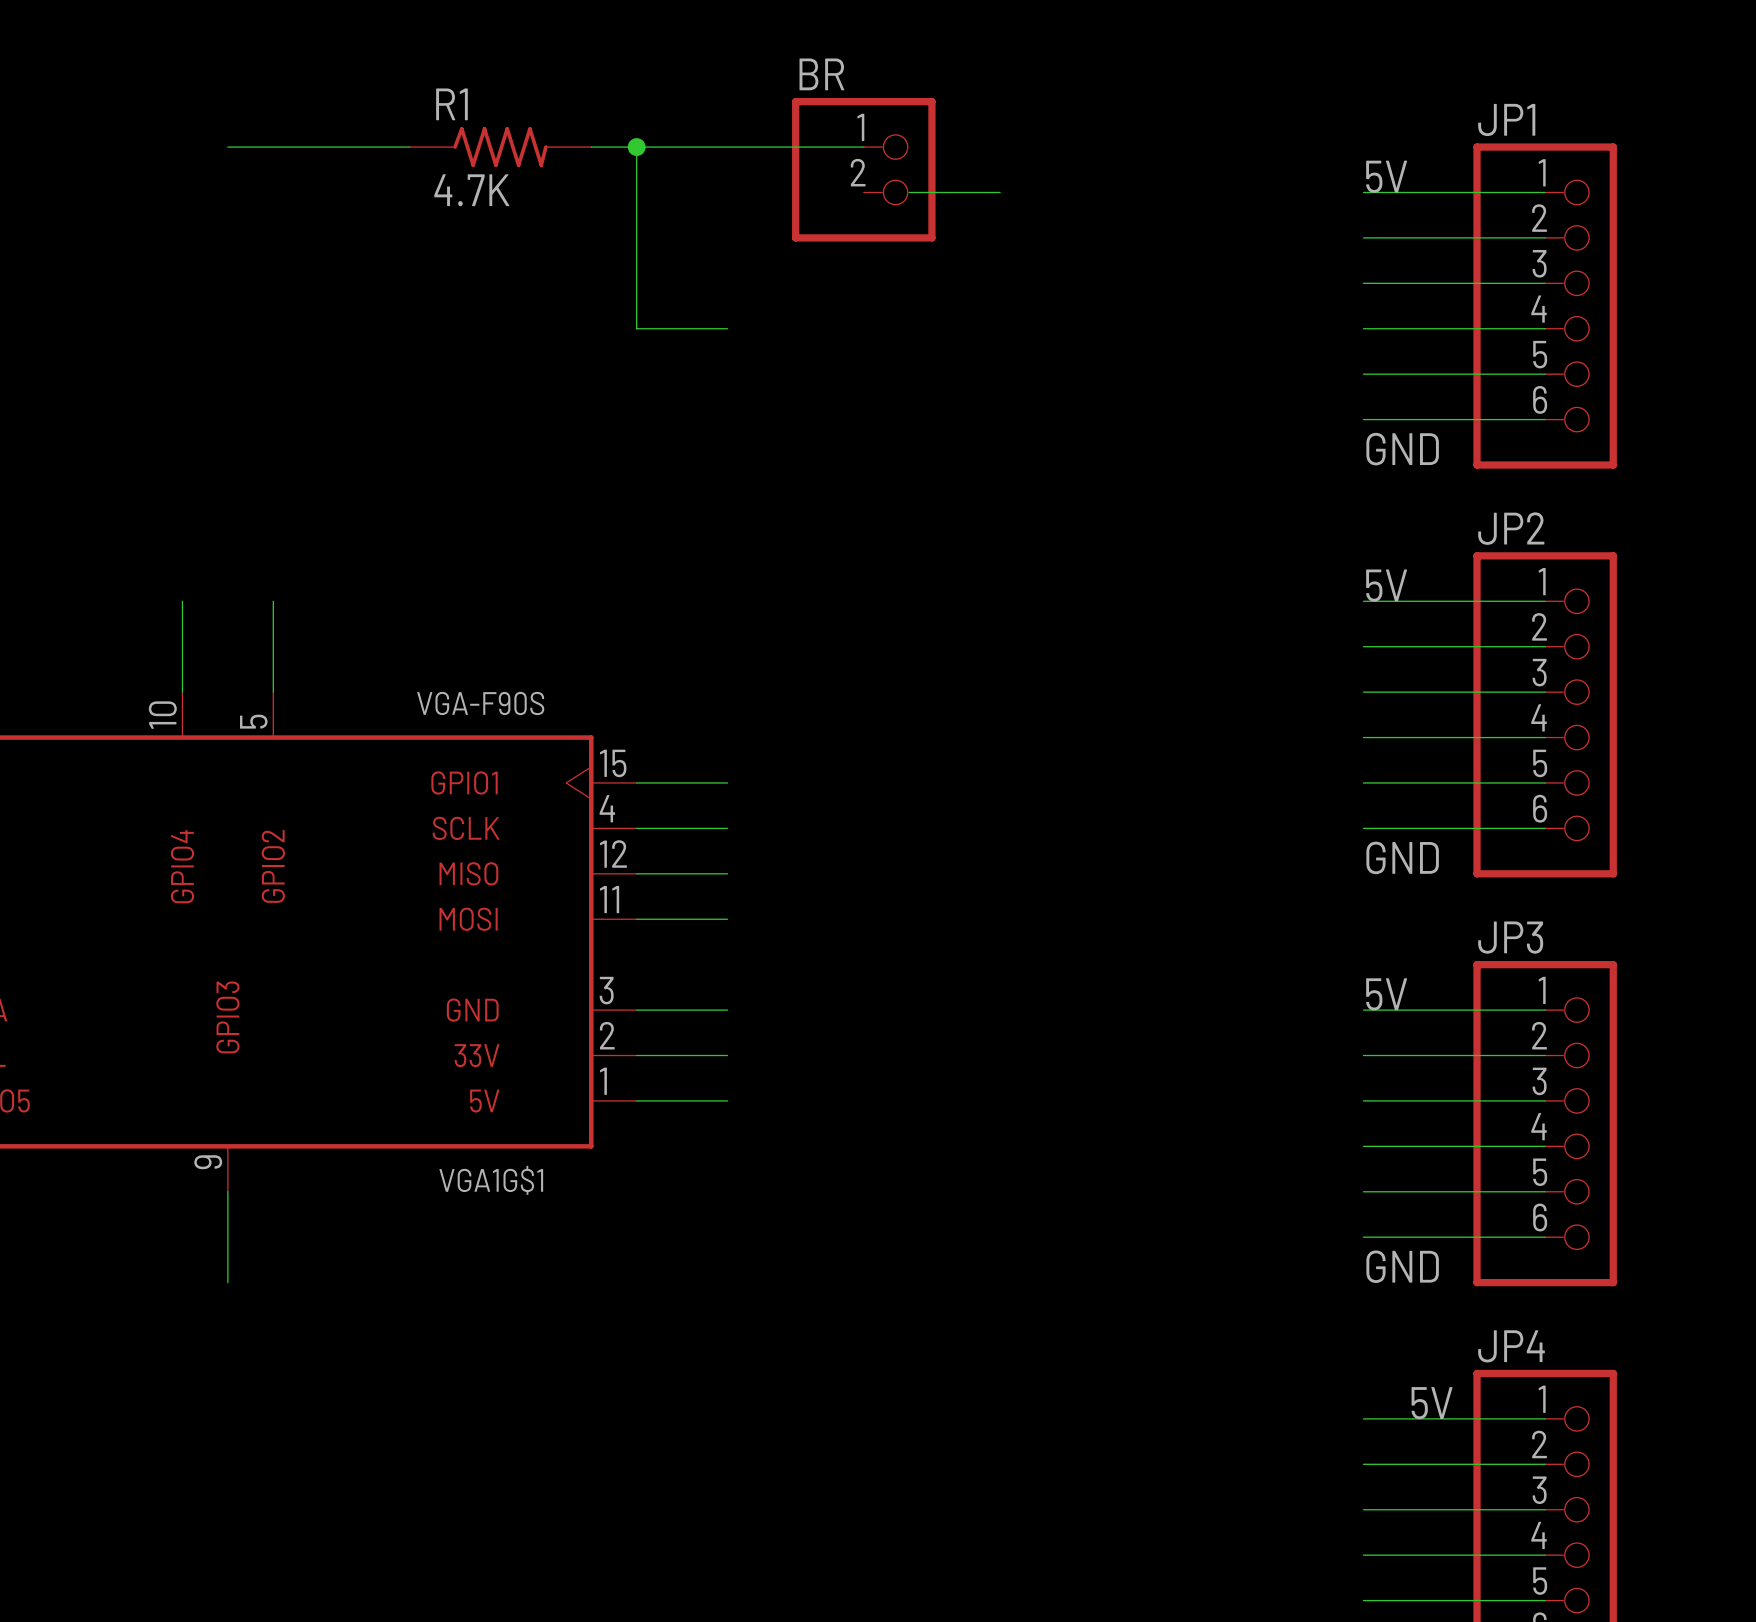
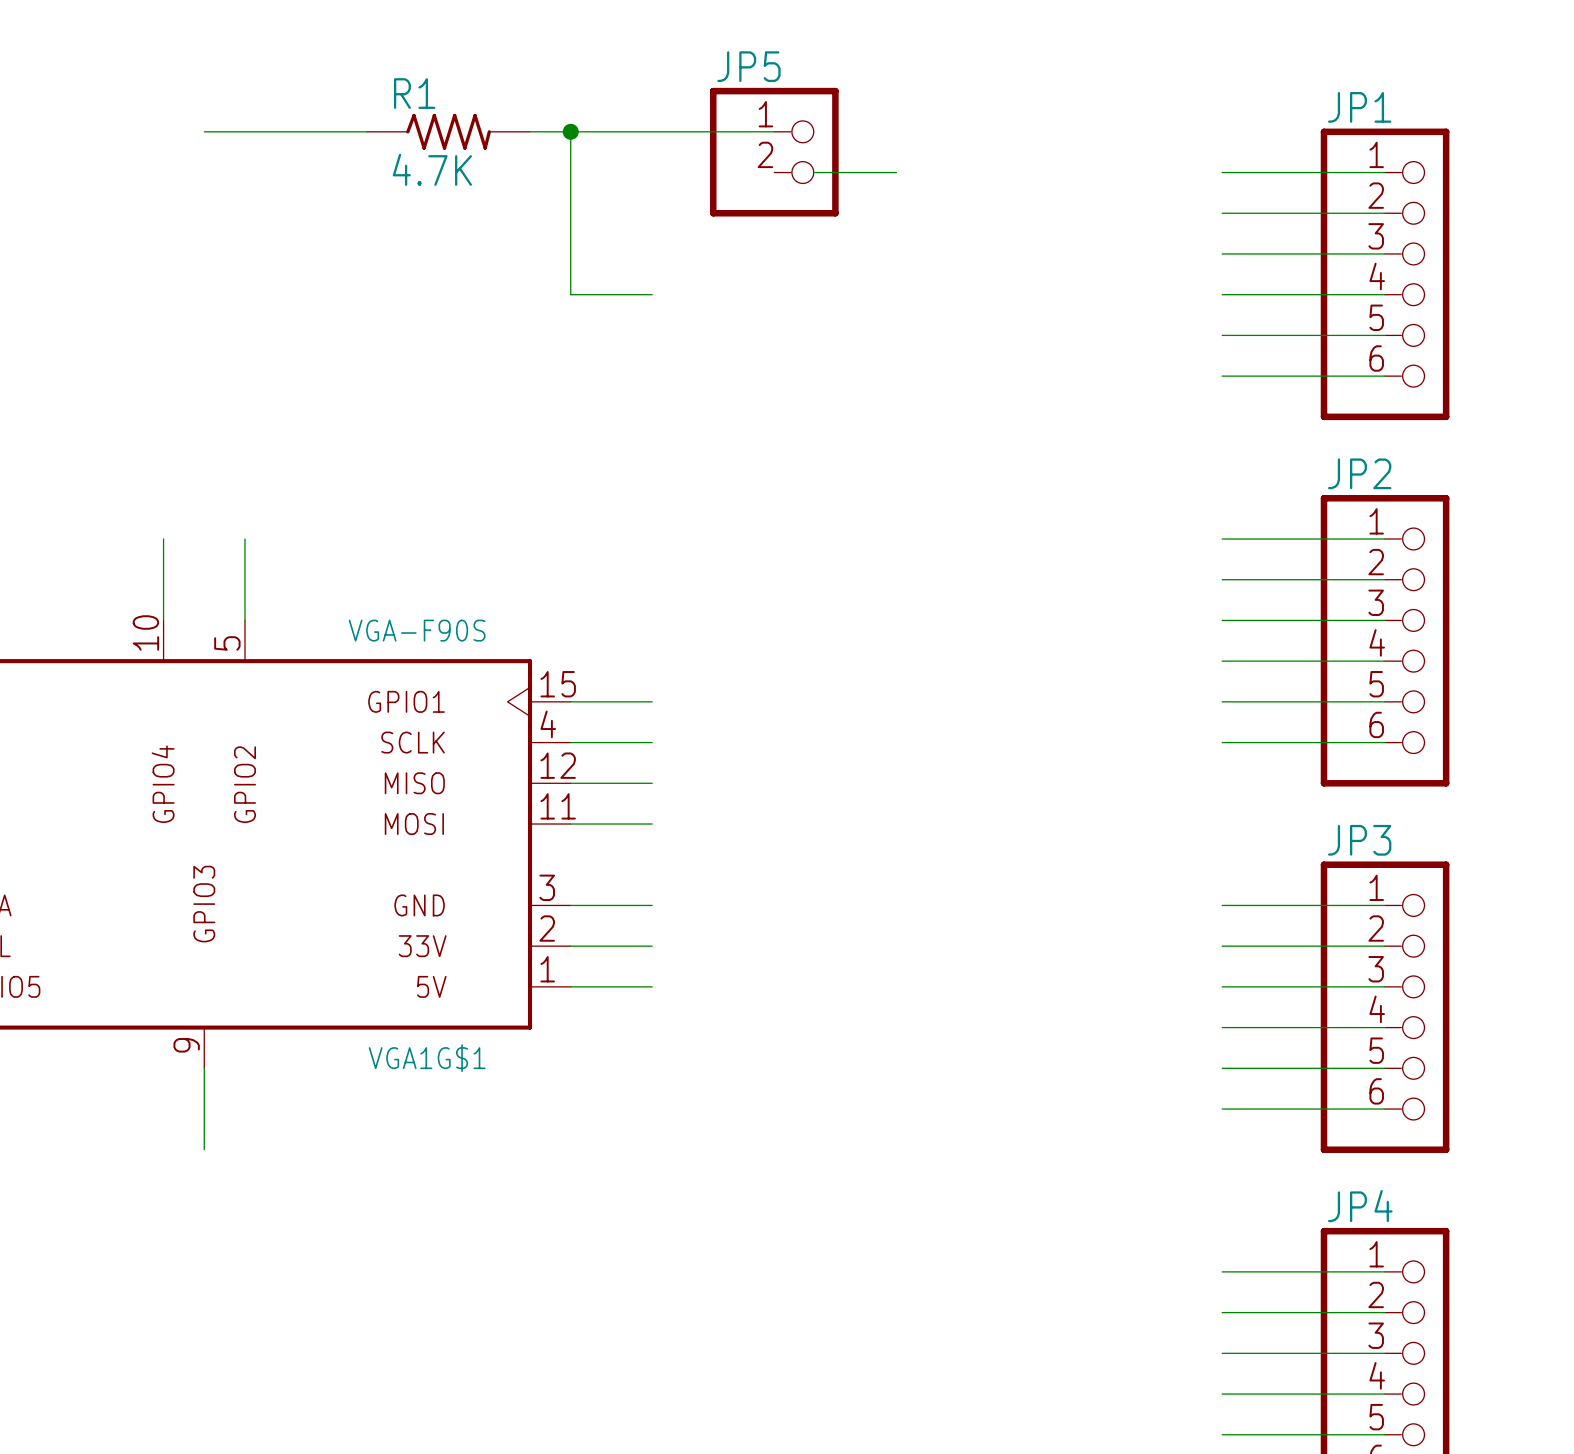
BR name: BR (821, 74) -> JP5 (748, 66)
label: 5V (1386, 176) -> none
label: GND (1402, 449) -> none
label: 5V (1386, 585) -> none
label: GND (1402, 857) -> none
label: 5V (1386, 994) -> none
label: GND (1402, 1266) -> none
label: 5V (1432, 1403) -> none

